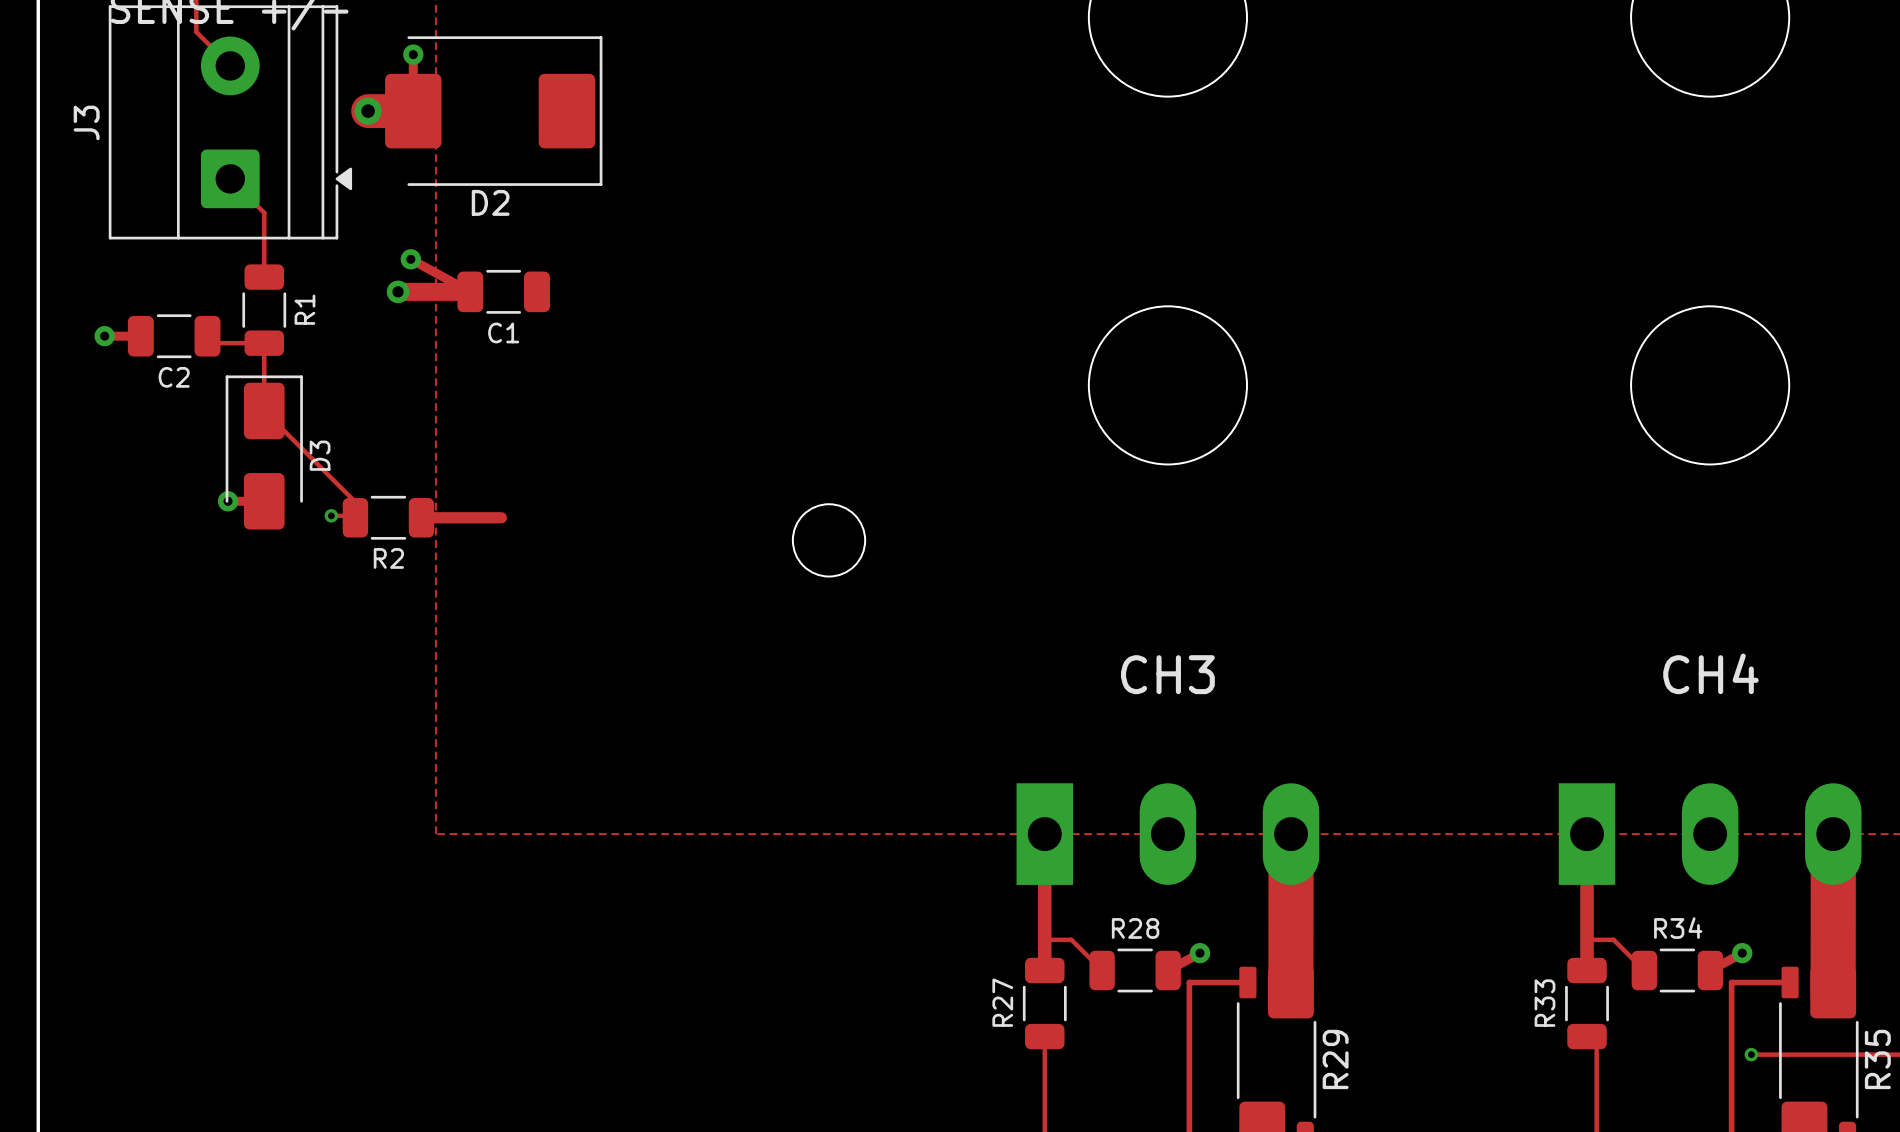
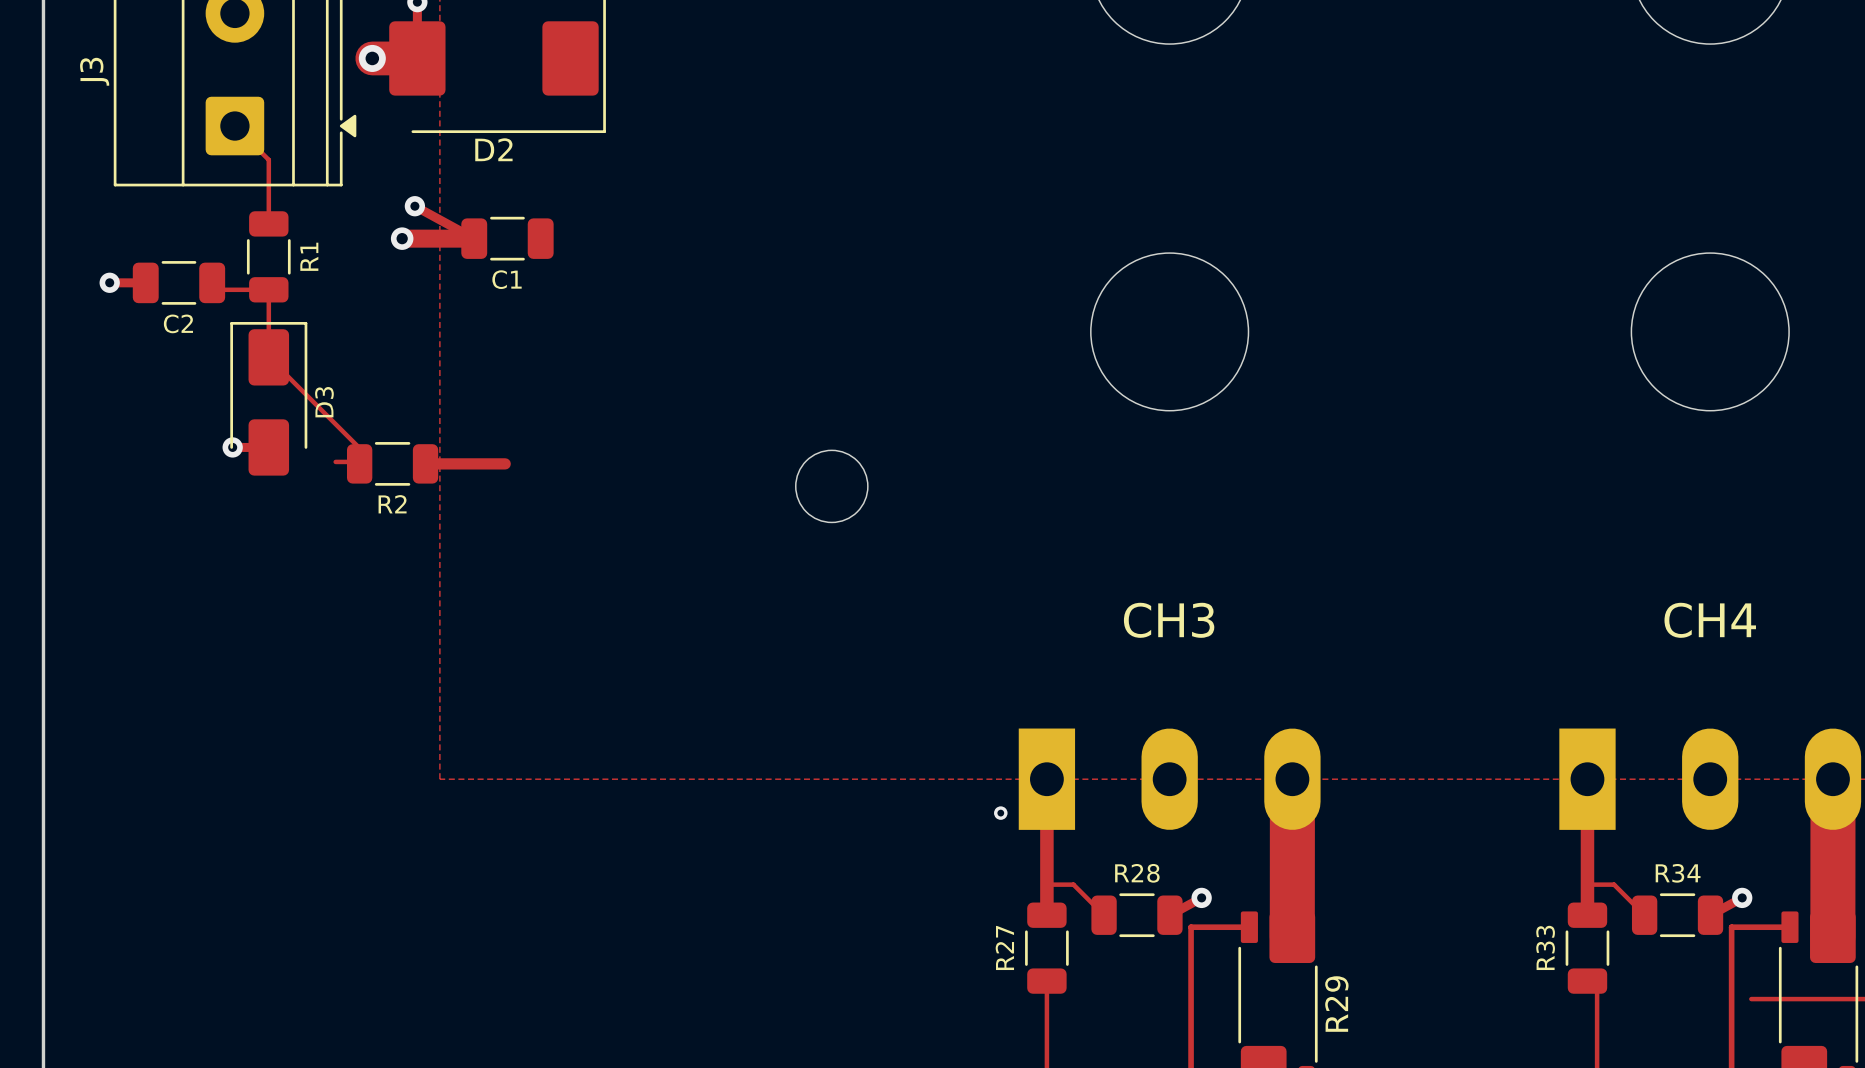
via: (331, 515) -> none
via: none -> (1000, 813)
via: (1751, 1054) -> none

